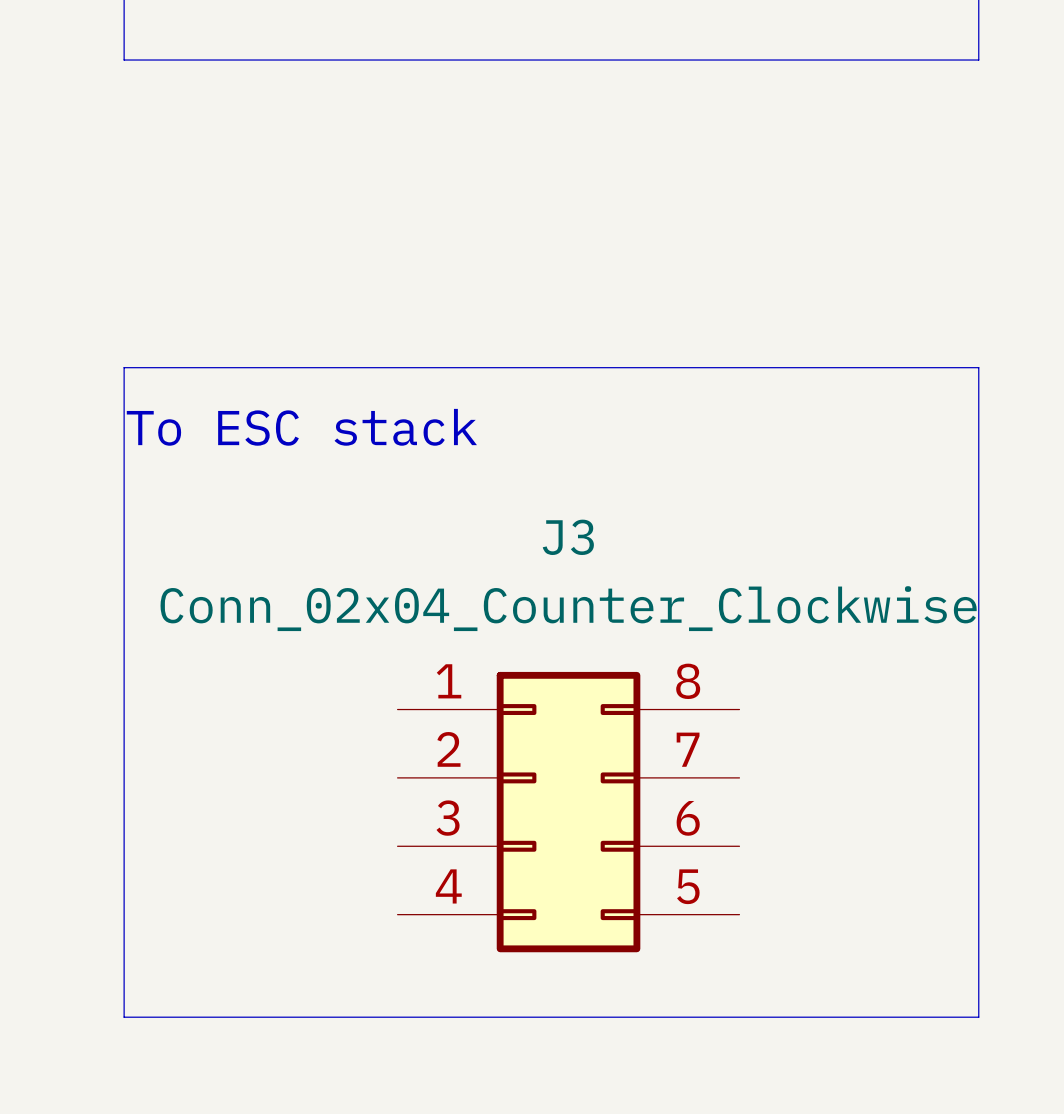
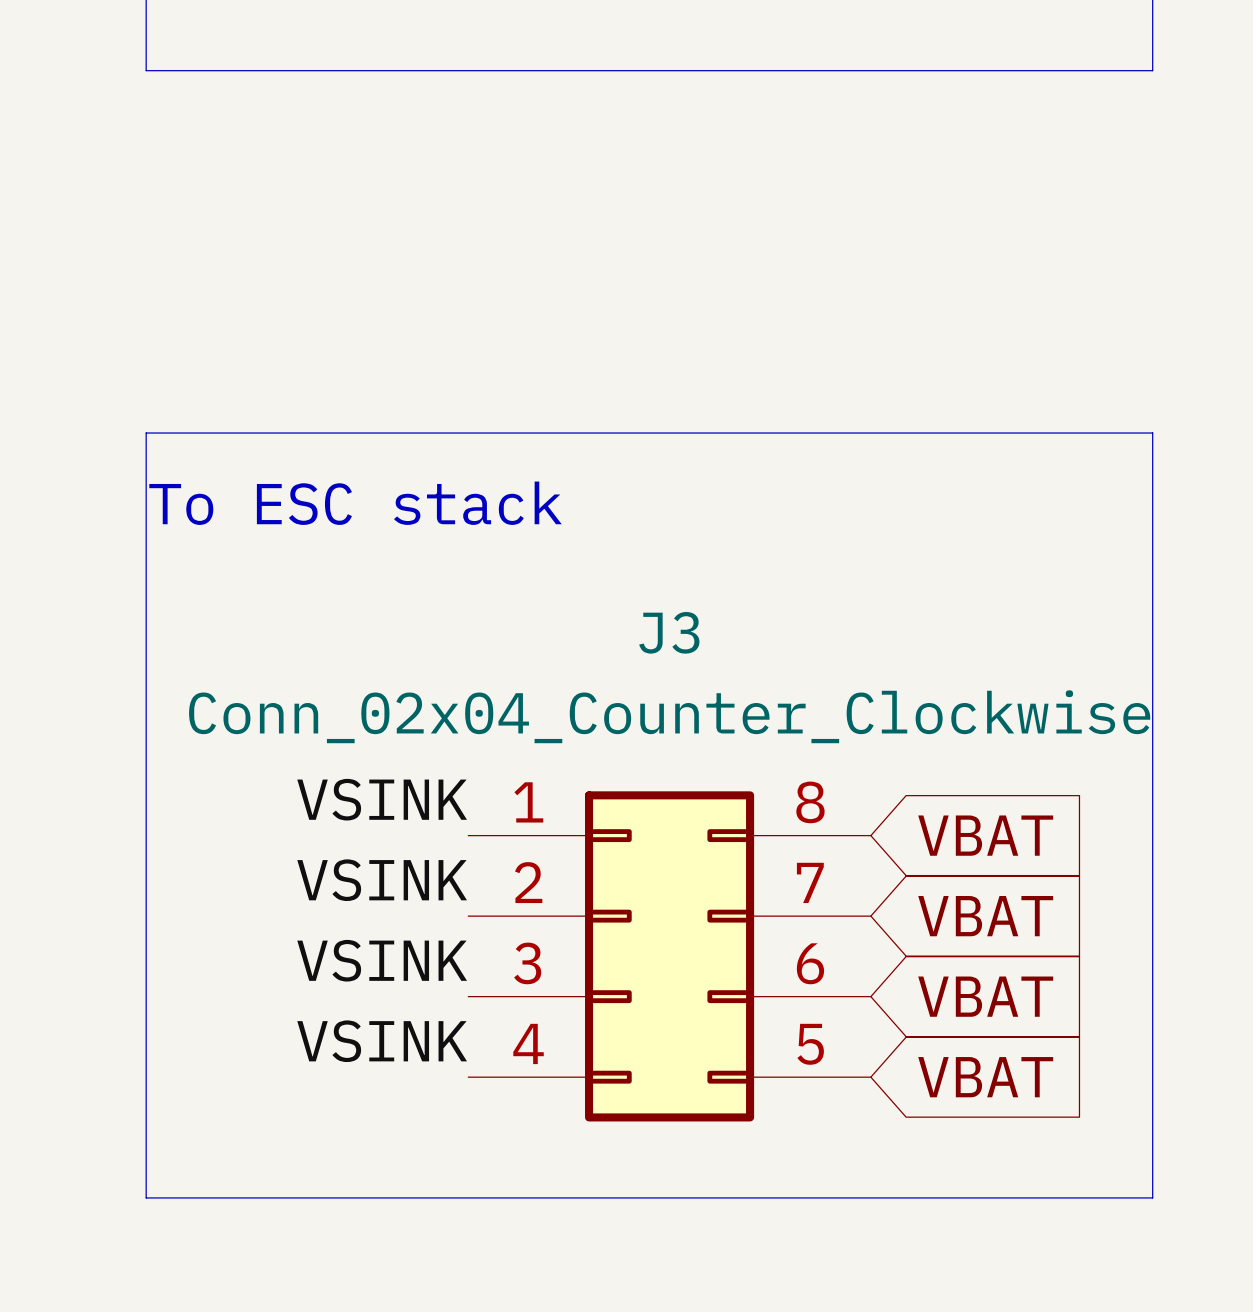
label: none -> VSINK (382, 799)
global label: none -> VBAT (985, 835)
label: none -> VSINK (382, 880)
global label: none -> VBAT (985, 916)
label: none -> VSINK (382, 960)
global label: none -> VBAT (985, 996)
label: none -> VSINK (382, 1041)
global label: none -> VBAT (985, 1077)

